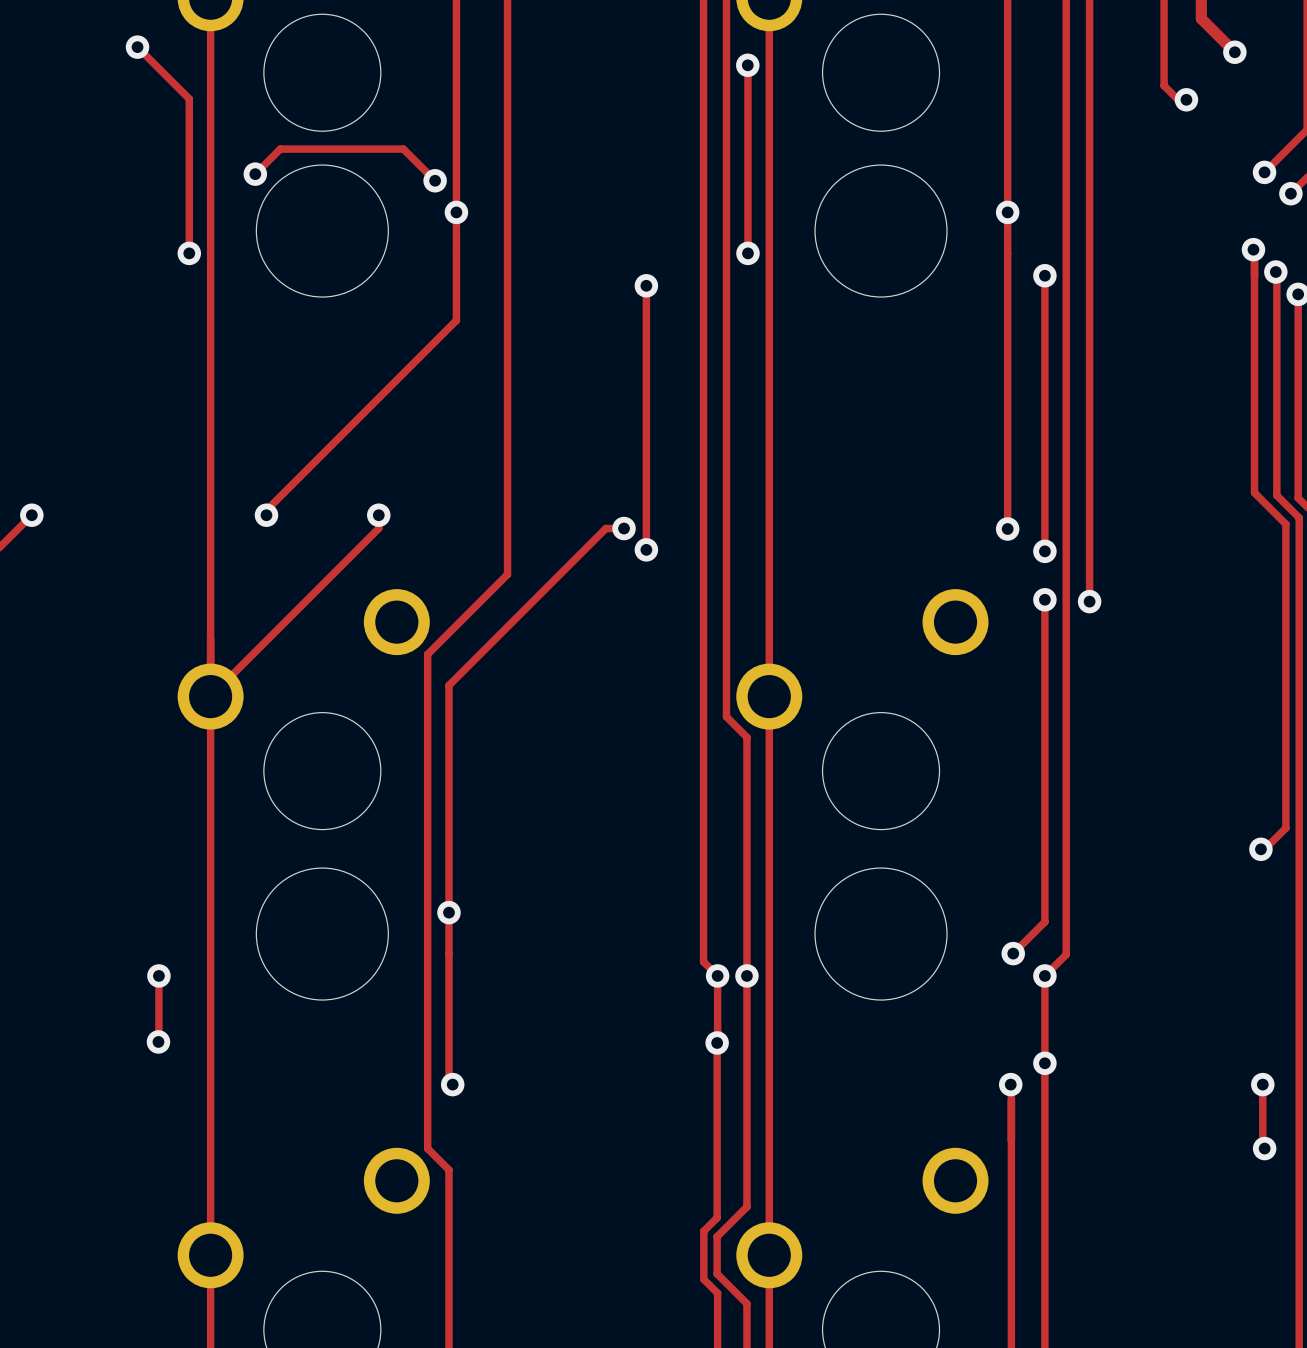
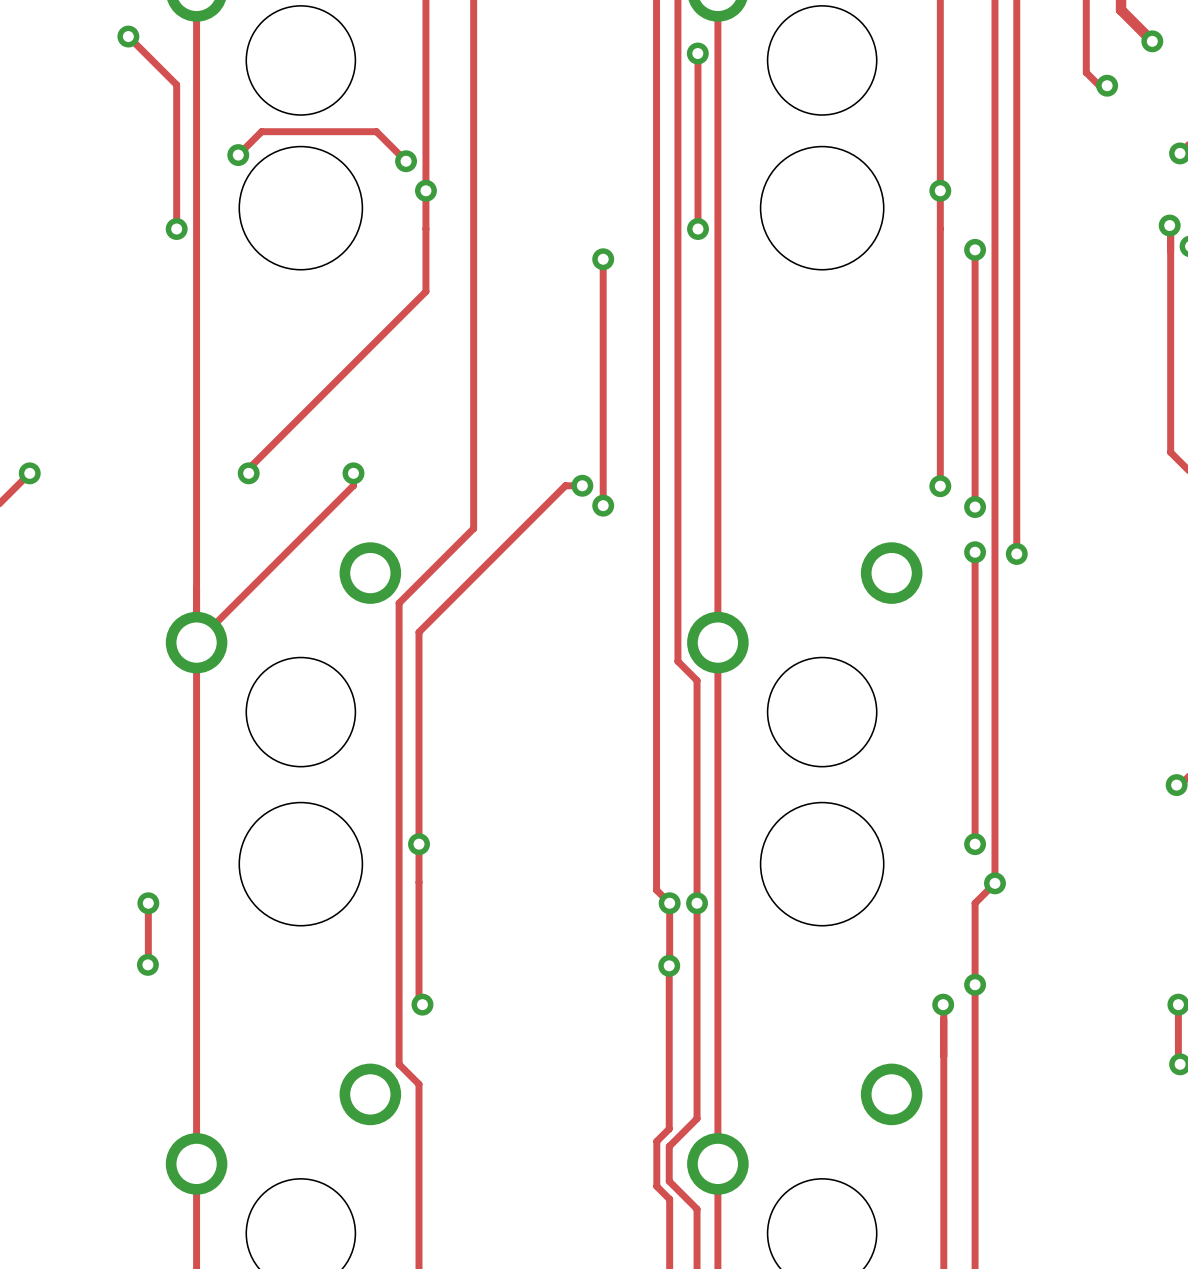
track: (1044, 912) (1044, 921) (1013, 953) -> none
via: none -> (975, 844)
via: (1013, 953) -> none
via: none -> (994, 883)
via: (1044, 975) -> none

